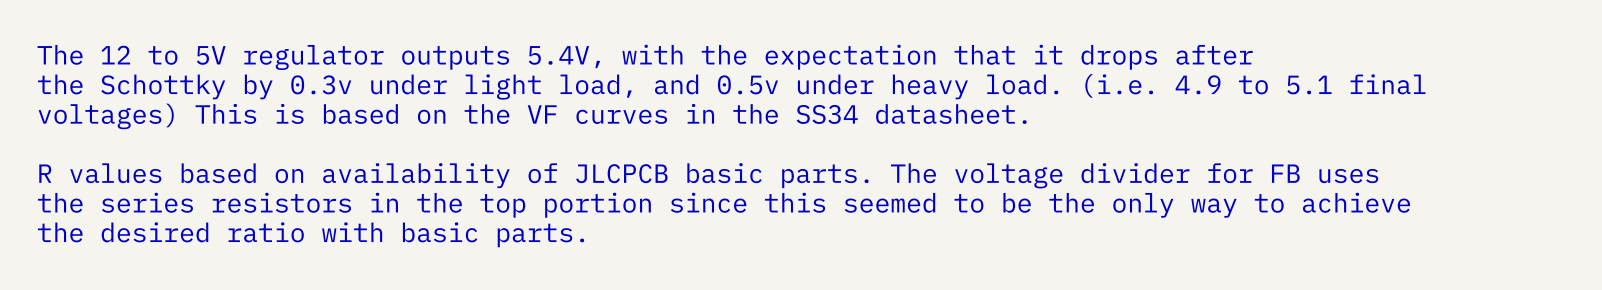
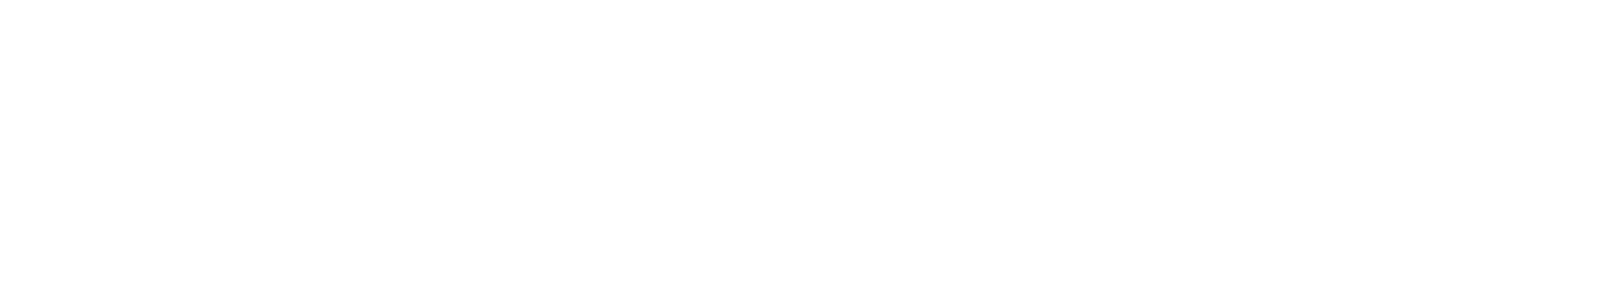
text: The 12 to 5V regulator outputs 5.4V, with the expectation that it drops after (645, 57) -> none
text: the Schottky by 0.3v under light load, and 0.5v under heavy load. (i.e. 4.9 to 5.1 final (731, 86) -> none
text: voltages) This is based on the VF curves in the SS34 datasheet. (532, 116) -> none
text: R values based on availability of JLCPCB basic parts. The voltage divider for FB uses (708, 175) -> none
text: the series resistors in the top portion since this seemed to be the only way to achieve (724, 205) -> none
text: the desired ratio with basic parts. (311, 234) -> none

